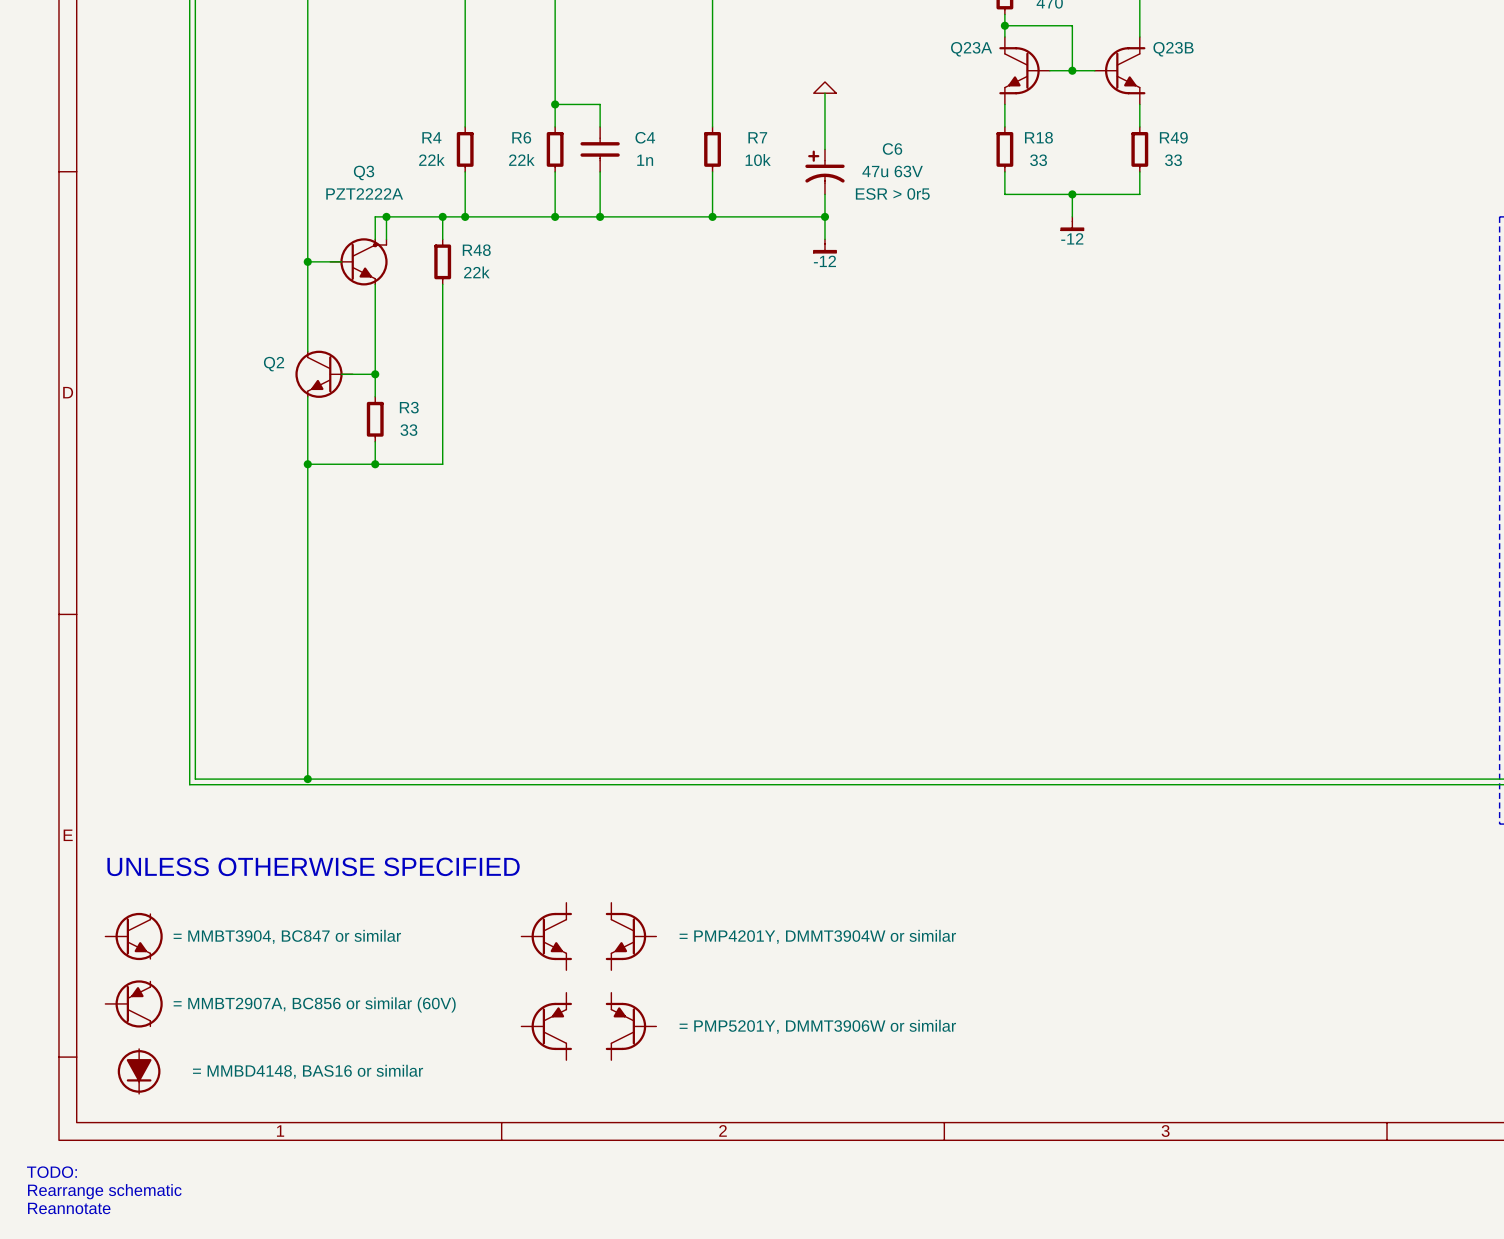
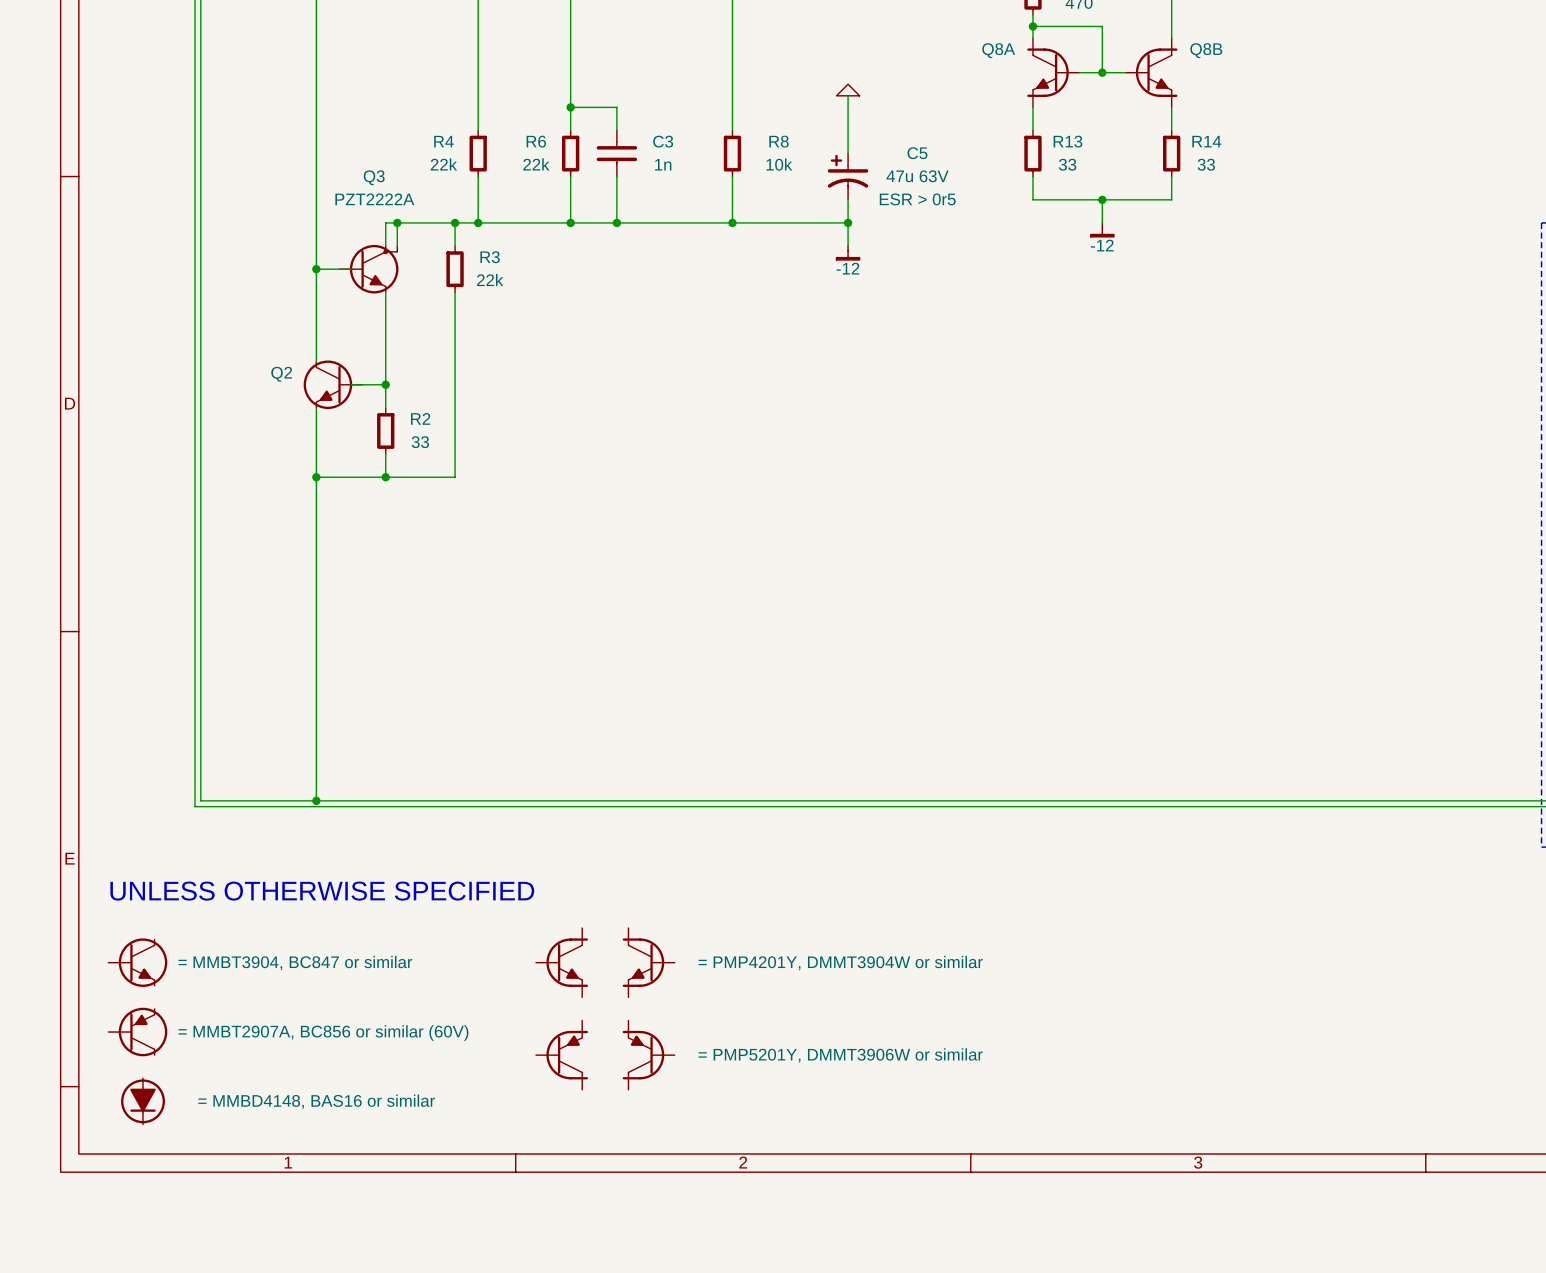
Q23A name: Q23A (971, 49) -> Q8A (998, 50)
Q23B name: Q23B (1173, 49) -> Q8B (1206, 50)
C4 name: C4 (645, 137) -> C3 (663, 141)
R7 name: R7 (757, 137) -> R8 (779, 141)
R18 name: R18 (1038, 137) -> R13 (1067, 141)
R49 name: R49 (1173, 137) -> R14 (1206, 141)
C6 name: C6 (892, 149) -> C5 (917, 153)
R48 name: R48 (476, 250) -> R3 (490, 257)
R3 name: R3 (409, 407) -> R2 (420, 418)
text: TODO: (51, 1172) -> none
text: Rearrange schematic (104, 1191) -> none
text: Reannotate (69, 1208) -> none

